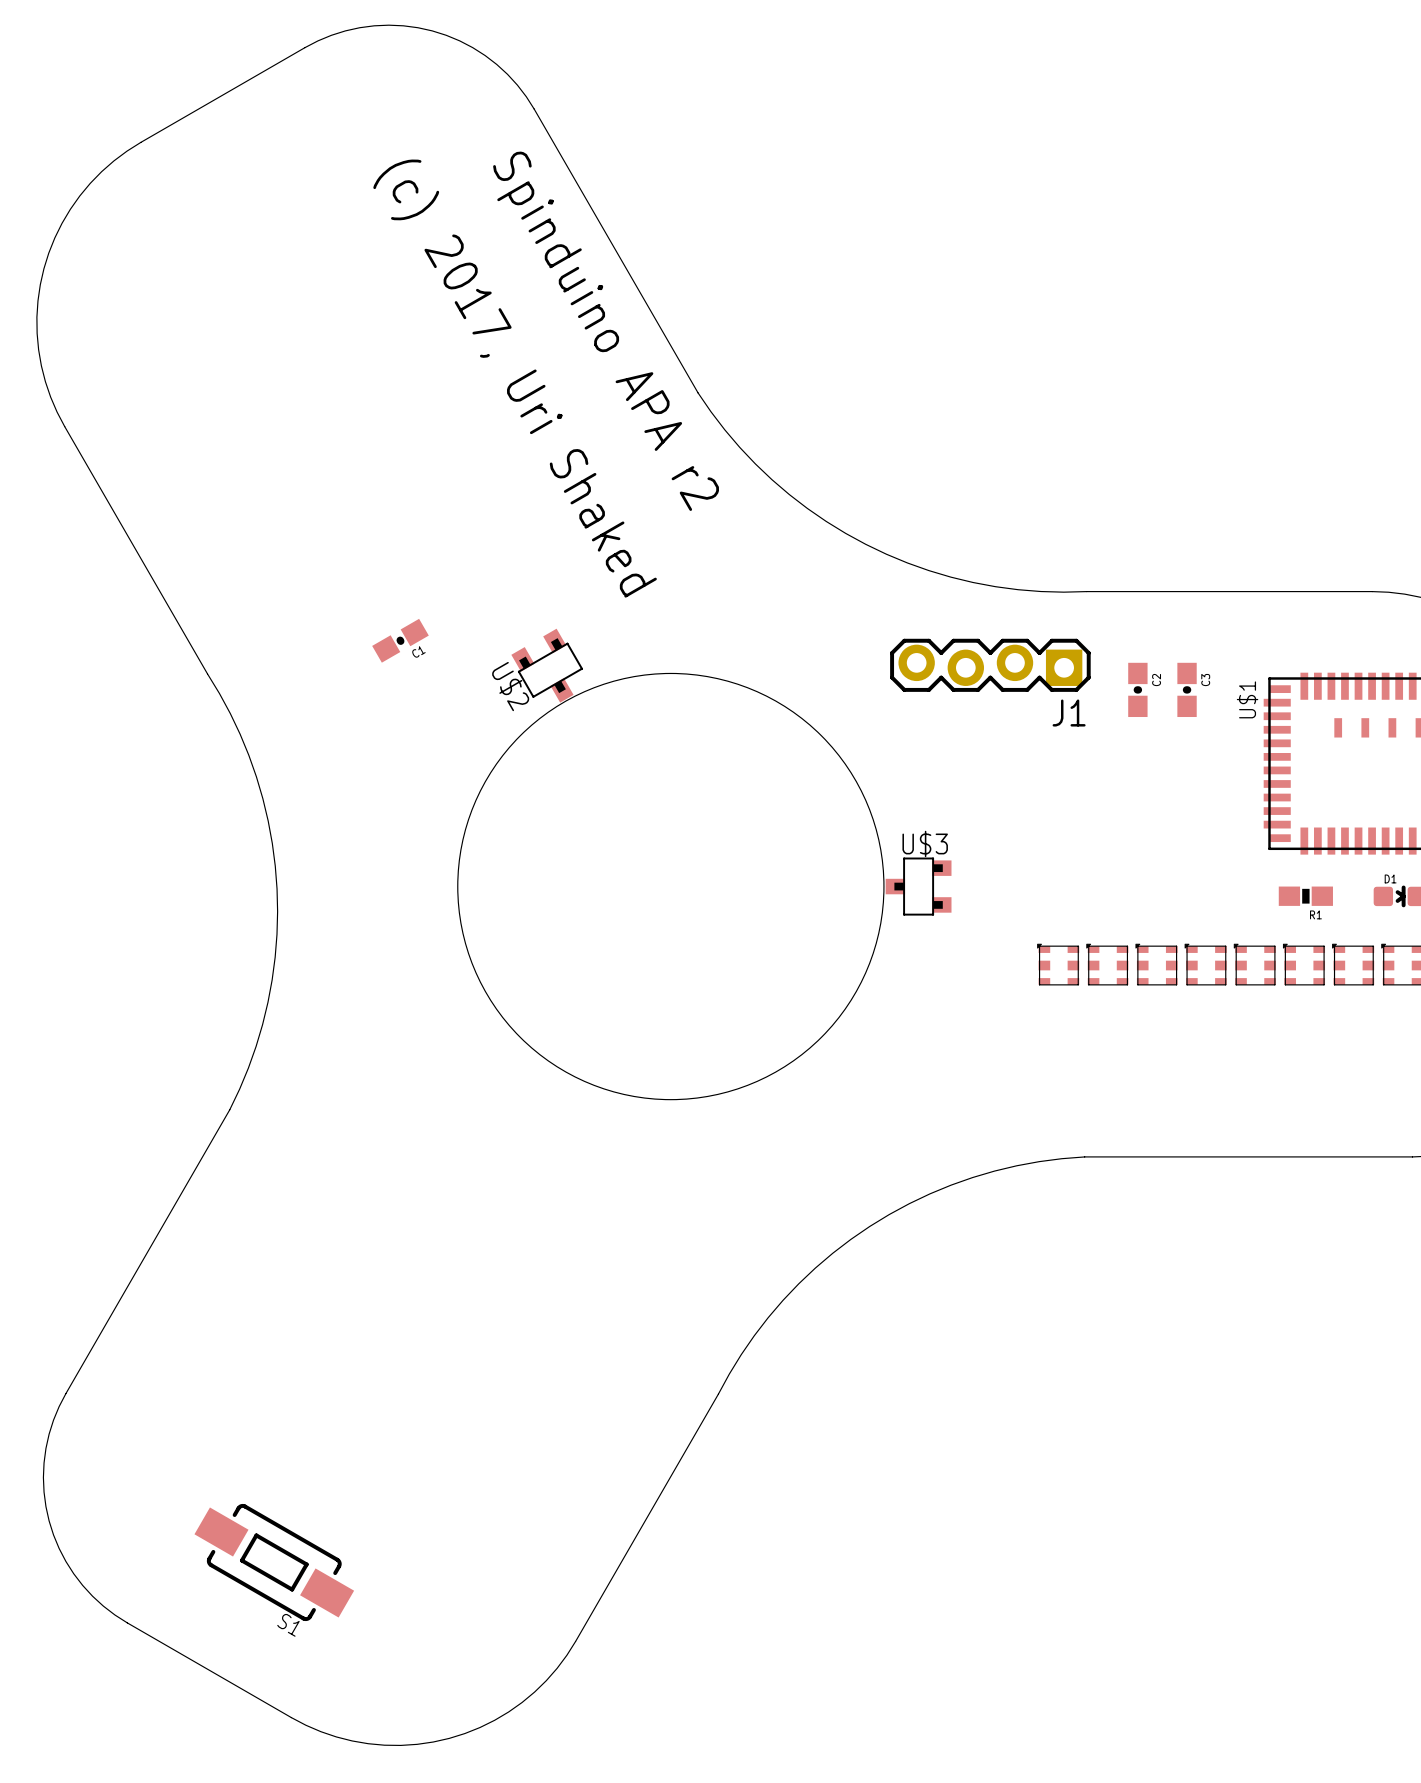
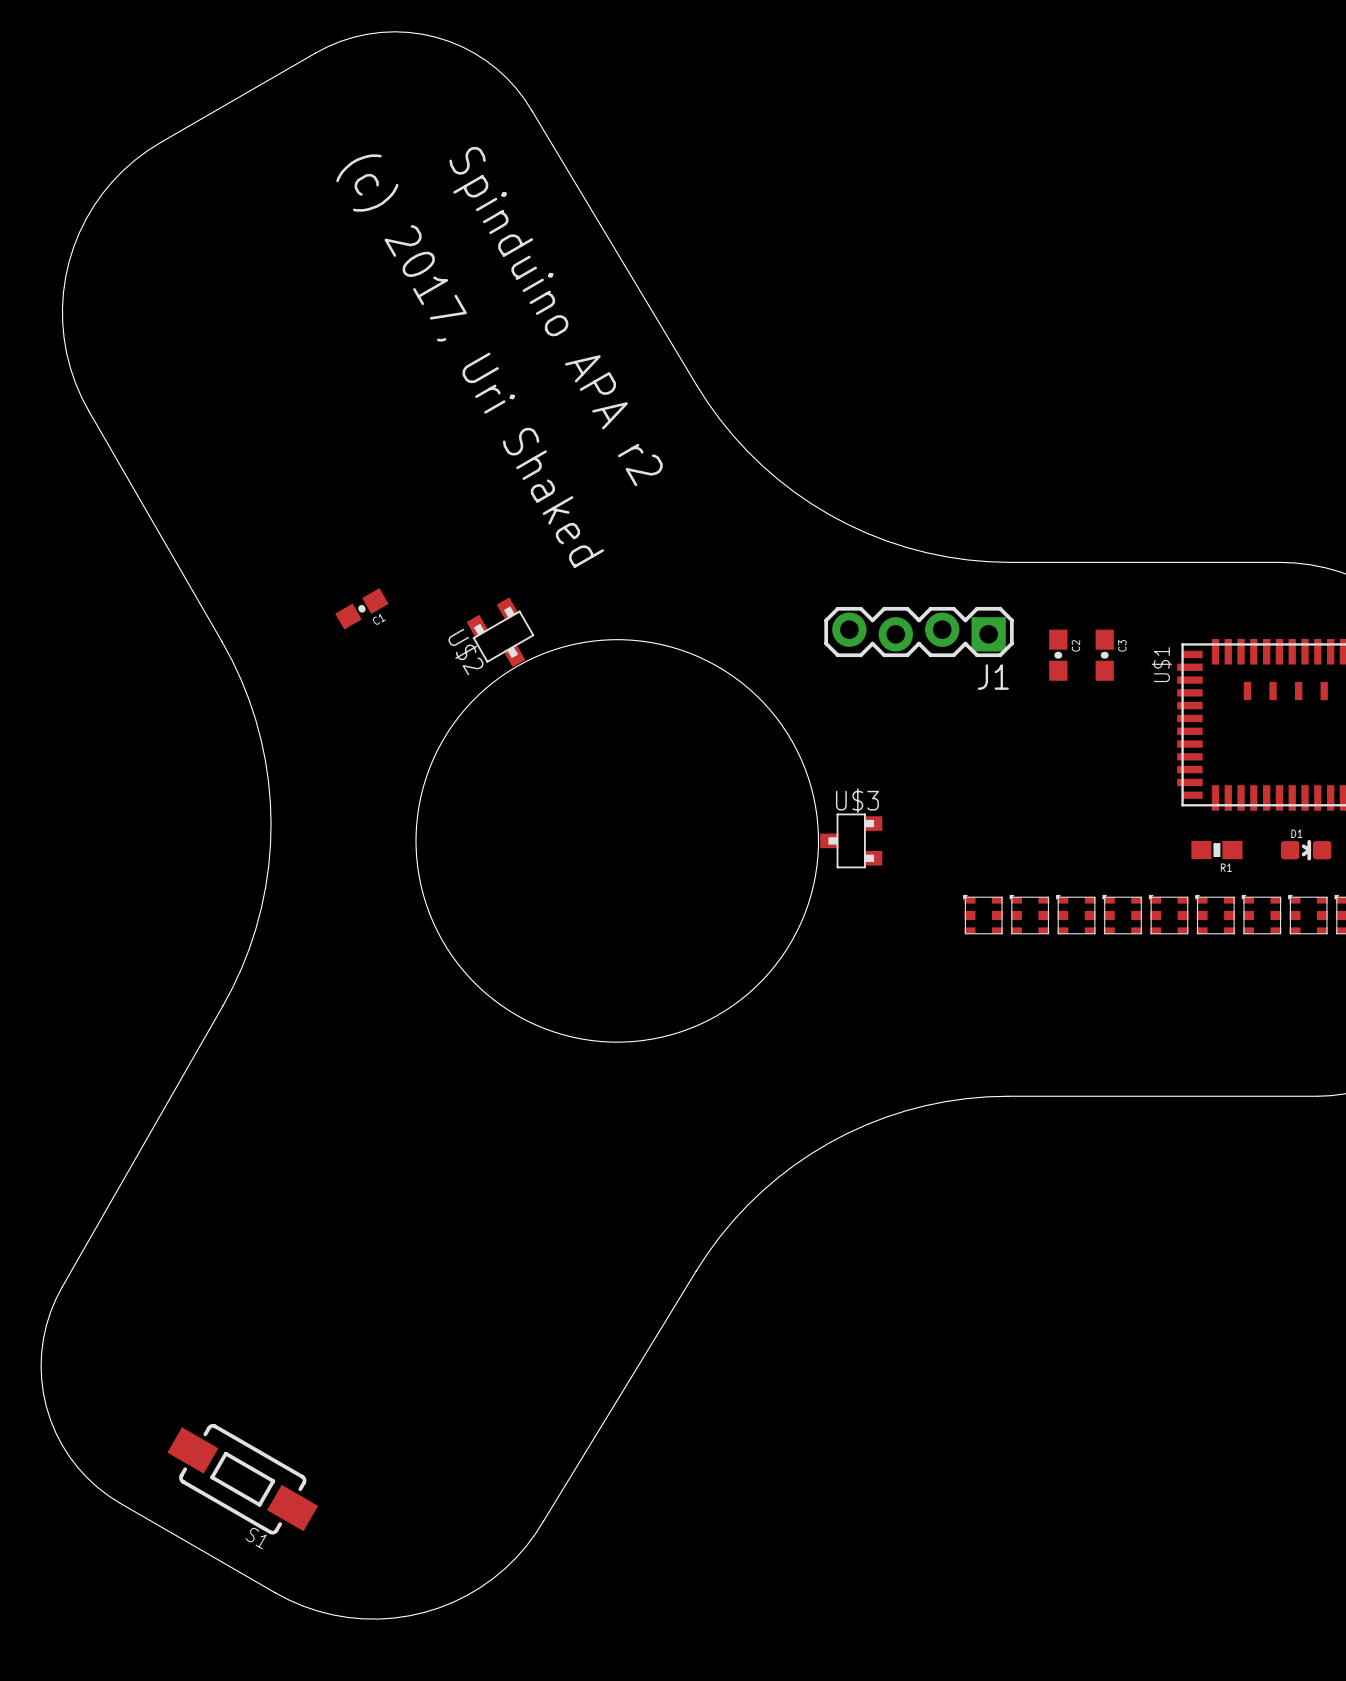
board edge: (1086, 591) (1040, 591) (995, 586) (928, 570) (886, 554) (845, 533) (807, 508) (771, 479) (739, 447) (698, 392) (526, 96) (496, 64) (459, 40) (418, 27) (388, 25) (359, 27) (331, 35) (304, 47) (140, 142) (101, 171) (70, 209) (48, 253) (37, 300) (37, 333) (41, 365) (50, 397) (64, 426) (219, 693) (240, 734) (256, 776) (272, 843) (277, 888) (276, 934) (267, 1002) (256, 1046) (239, 1089) (229, 1109) (65, 1393) (53, 1420) (45, 1448) (43, 1477) (45, 1506) (53, 1534) (65, 1561) (82, 1585) (114, 1615) (305, 1725) (352, 1740) (384, 1745) (433, 1742) (464, 1733) (494, 1720) (522, 1702) (557, 1668) (575, 1641) (741, 1354) (783, 1300) (815, 1268) (850, 1239) (889, 1214) (951, 1185) (1016, 1165) (1084, 1156) -> (1009, 562) (968, 559) (926, 552) (867, 533) (811, 504) (762, 465) (733, 435) (707, 402) (524, 99) (496, 68) (461, 46) (422, 34) (394, 31) (367, 34) (340, 41) (315, 53) (160, 142) (123, 170) (94, 205) (73, 247) (65, 276) (62, 307) (66, 353) (75, 383) (88, 410) (222, 641) (241, 679) (255, 719) (265, 760) (270, 802) (270, 844) (261, 907) (249, 948) (232, 987) (62, 1286) (50, 1311) (43, 1338) (41, 1366) (43, 1393) (50, 1420) (62, 1445) (78, 1467) (108, 1495) (288, 1599) (332, 1614) (363, 1618) (409, 1615) (439, 1607) (467, 1595) (493, 1578) (526, 1546) (707, 1253) (732, 1221) (761, 1191) (794, 1165) (829, 1143) (885, 1117) (946, 1101) (1008, 1096)

